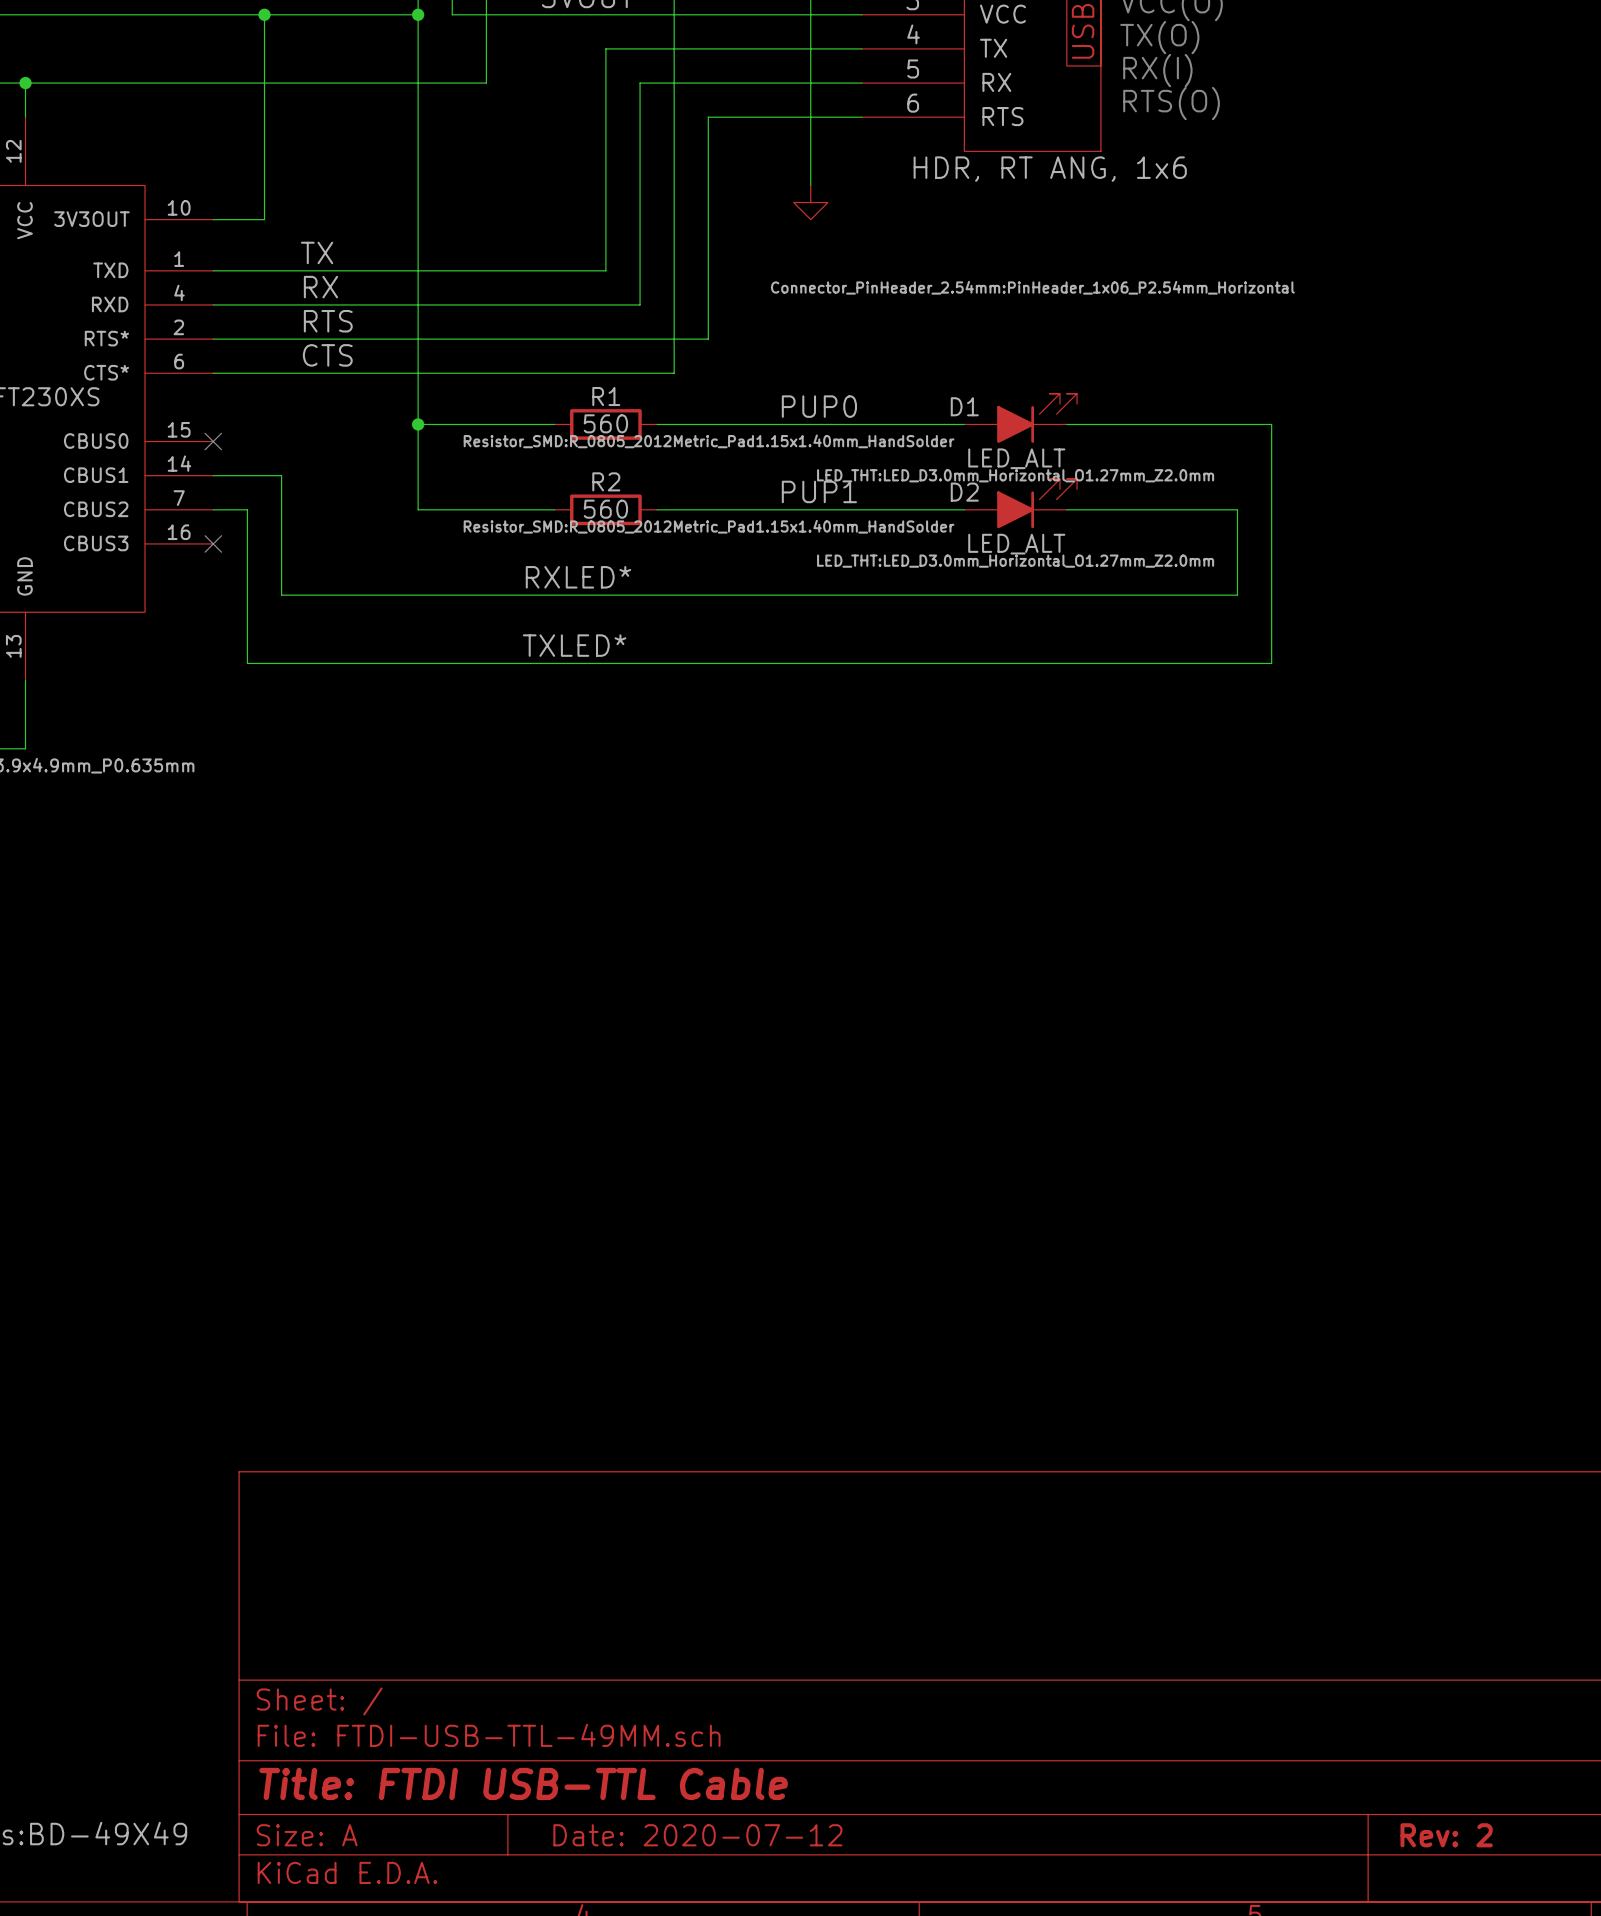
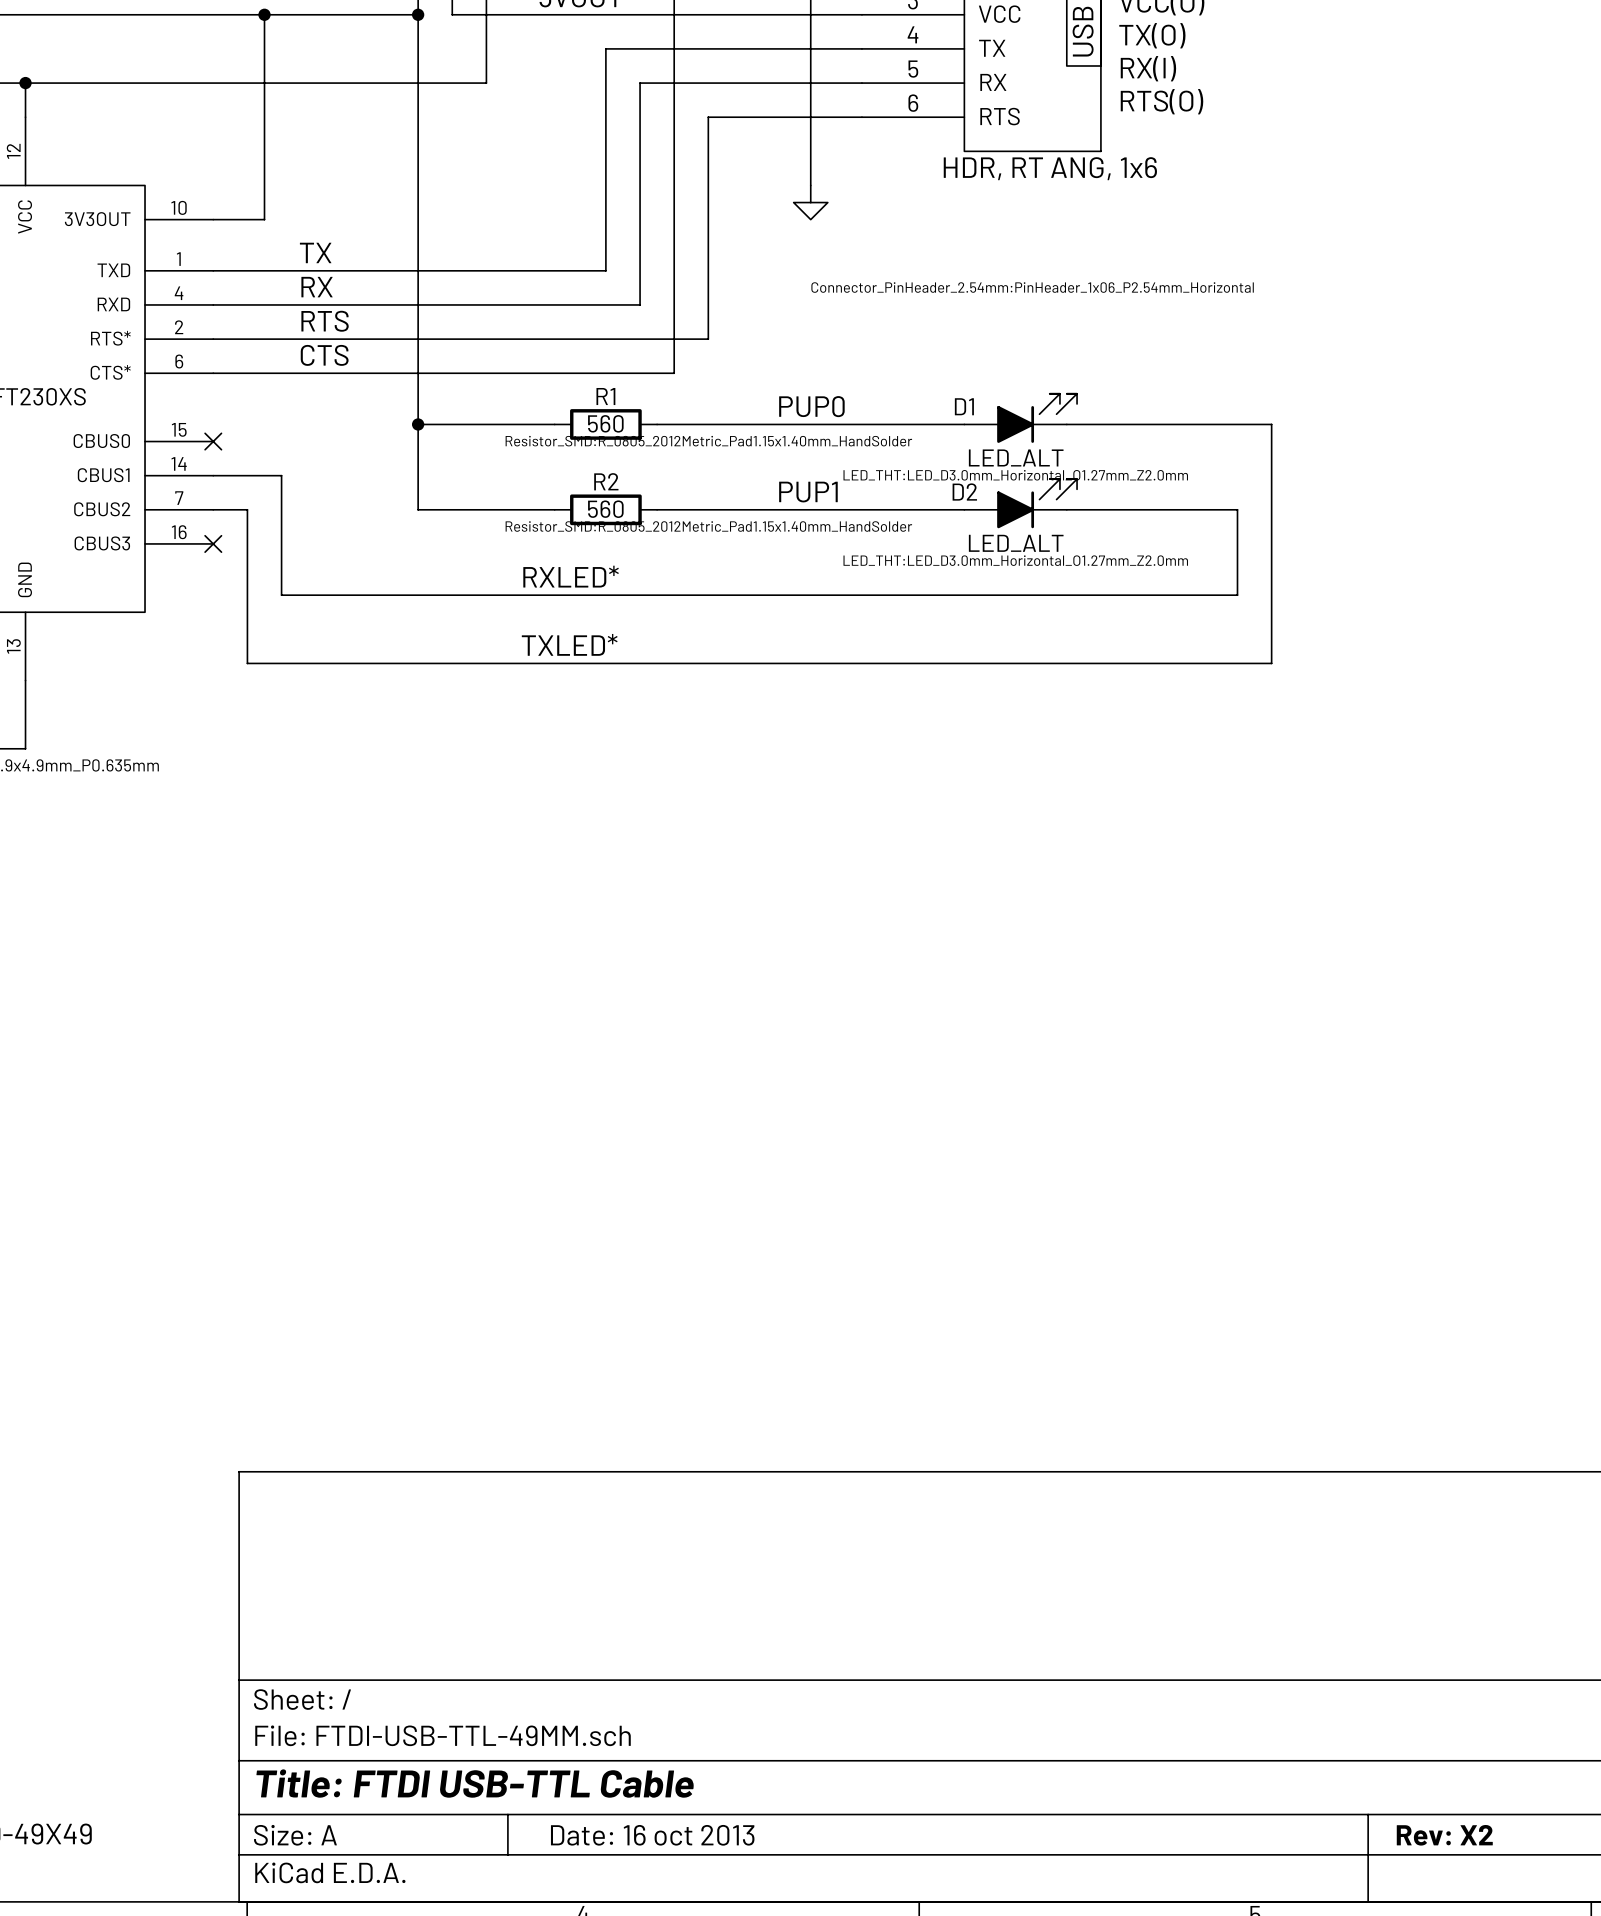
title block: Date: 2020-07-12 (697, 1835) -> Date: 16 oct 2013 (652, 1835)
title block: Rev: 2 (1446, 1835) -> Rev: X2 (1444, 1835)

